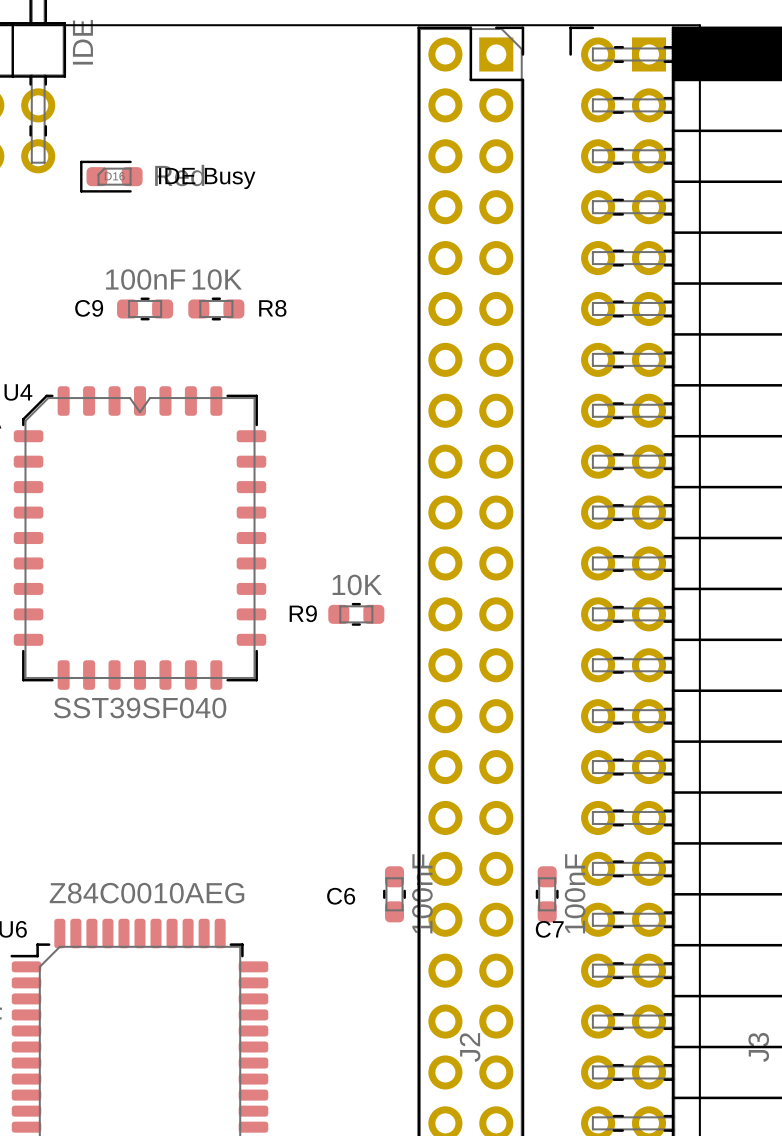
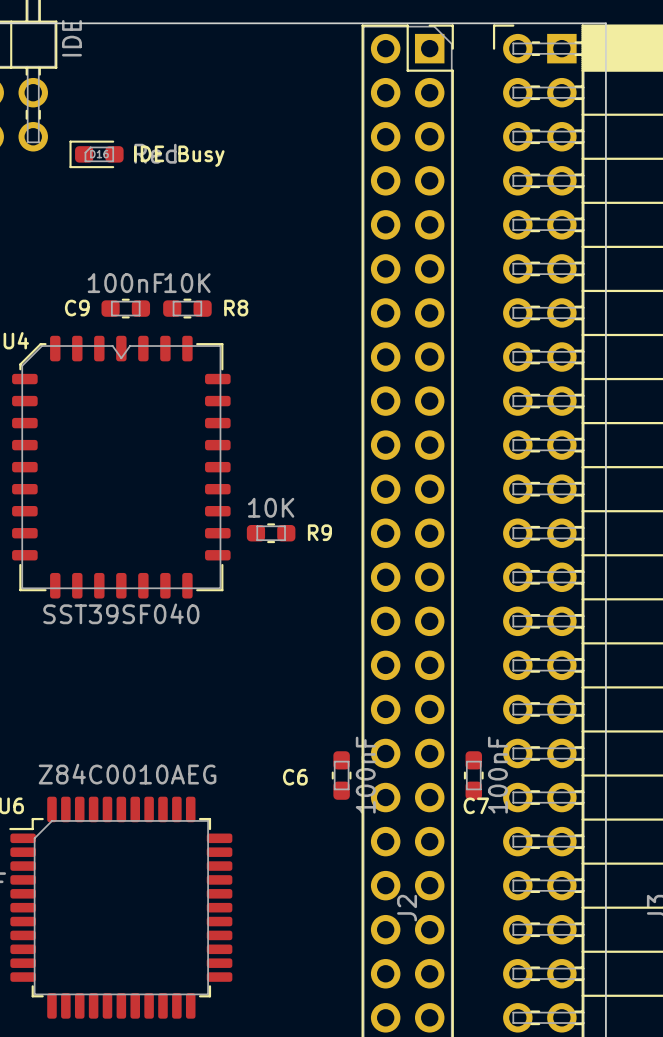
C9 position: (145, 308) -> (125, 308)
R8 position: (216, 308) -> (187, 308)
R9 name position: R9 (303, 613) -> R9 (319, 532)
R9 position: (356, 614) -> (271, 533)

